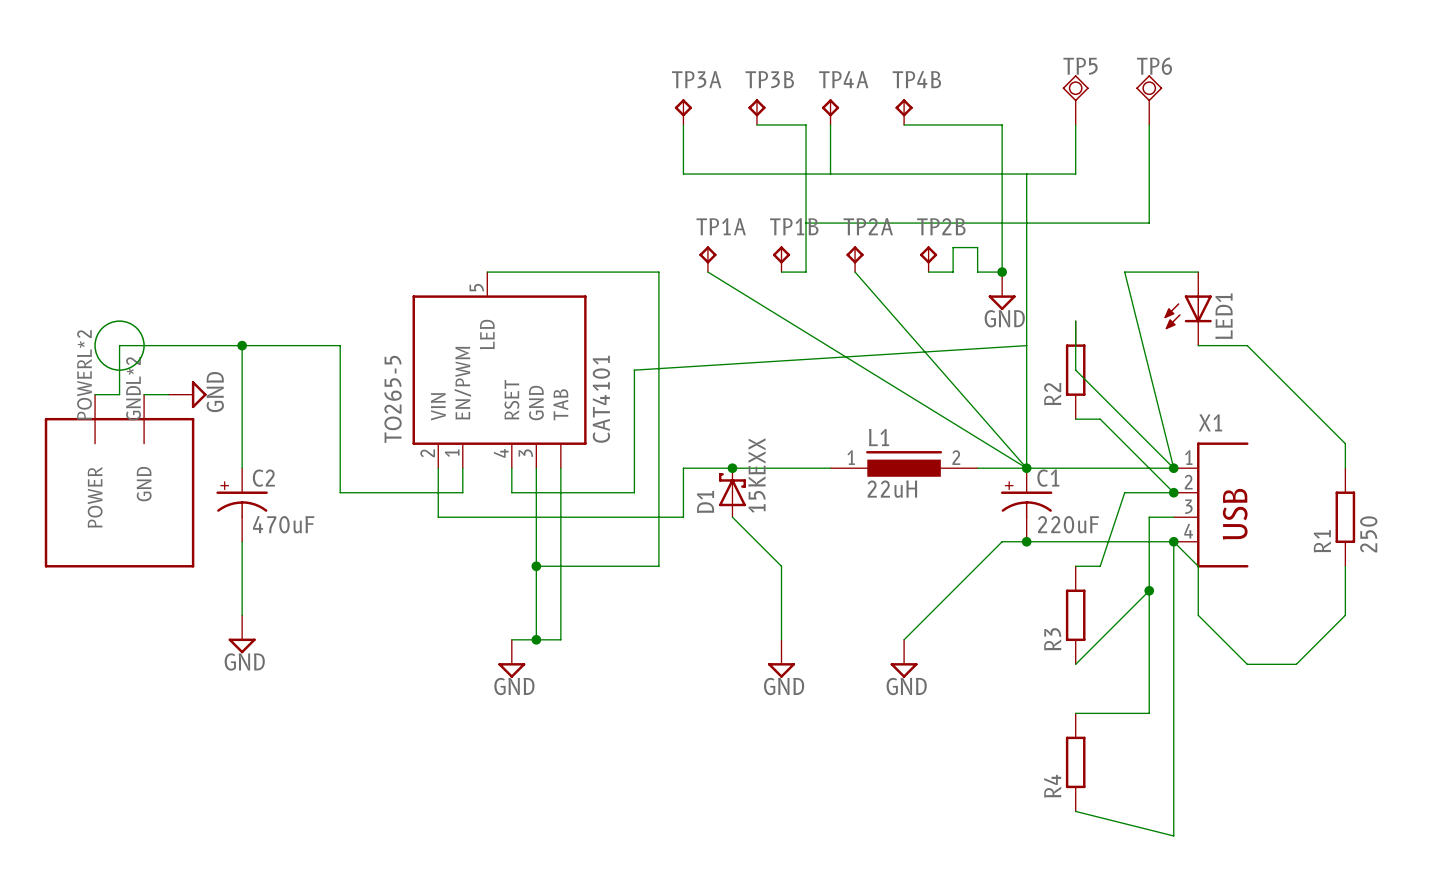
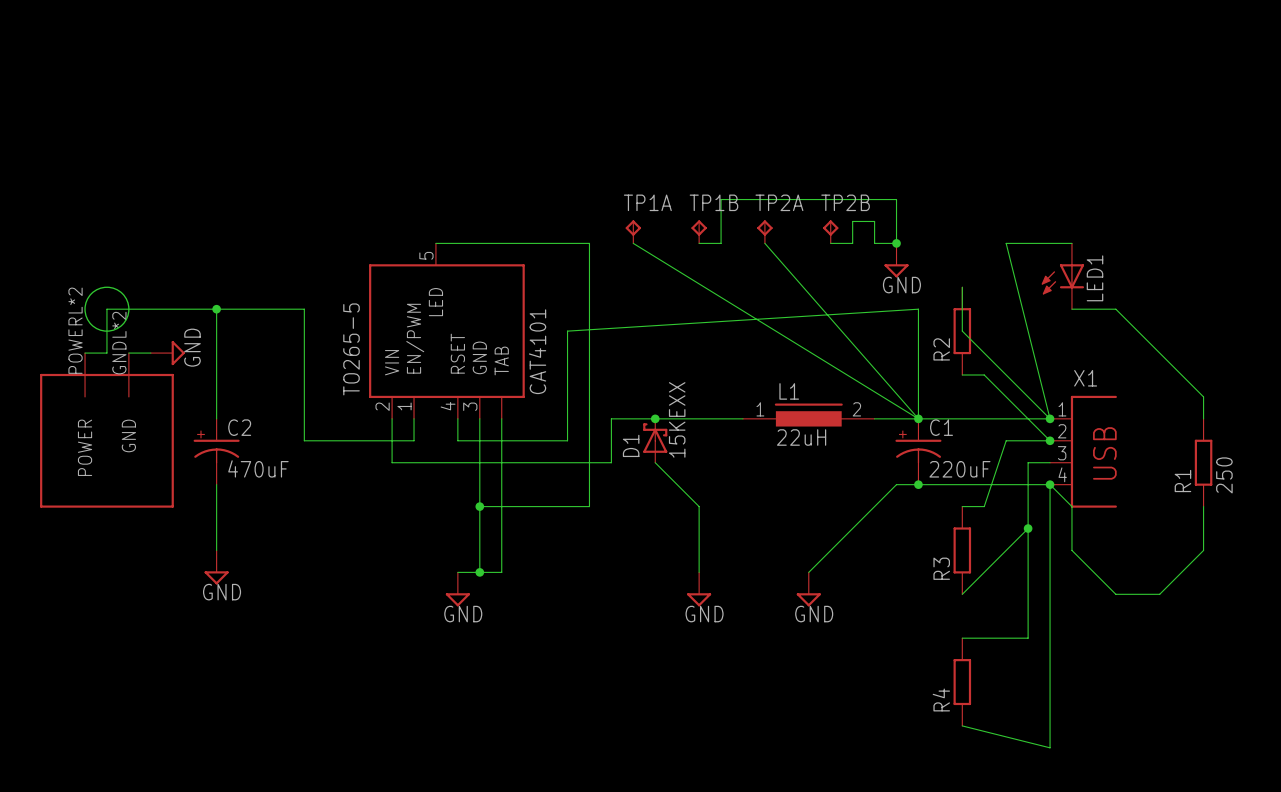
TP5: (1075, 100) -> none
TP6: (1149, 100) -> none
TP3A: (683, 112) -> none
TP3B: (756, 112) -> none
TP4A: (830, 112) -> none
TP4B: (904, 112) -> none
wire: (683, 124) (683, 174) (1075, 174) (1075, 124) -> none
wire: (756, 124) (806, 124) (806, 223) -> none
wire: (830, 124) (830, 174) -> none
wire: (904, 124) (1002, 124) (1002, 223) (1149, 223) (1149, 124) -> none
wire: (1026, 174) (1026, 345) -> none

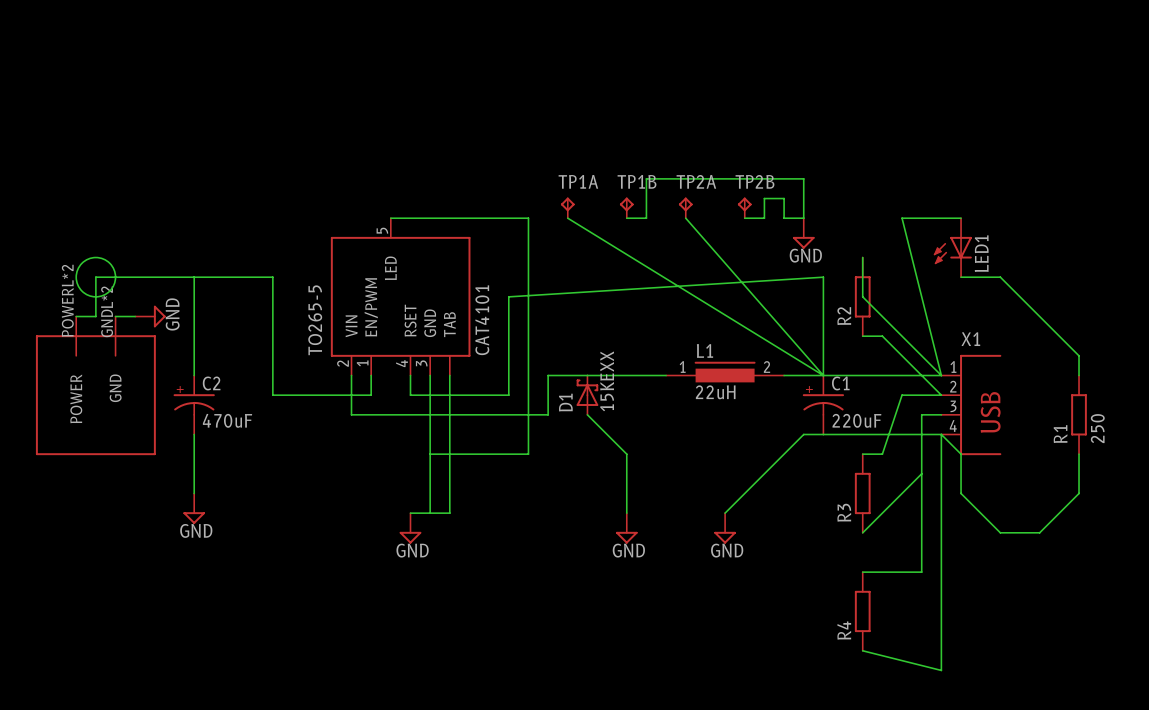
junction: (896, 243) -> none
junction: (216, 309) -> none
junction: (655, 418) -> none
junction: (918, 418) -> none
junction: (1050, 418) -> none
junction: (1050, 440) -> none
junction: (918, 484) -> none
junction: (1050, 484) -> none
junction: (479, 506) -> none
junction: (1028, 528) -> none
junction: (479, 572) -> none

